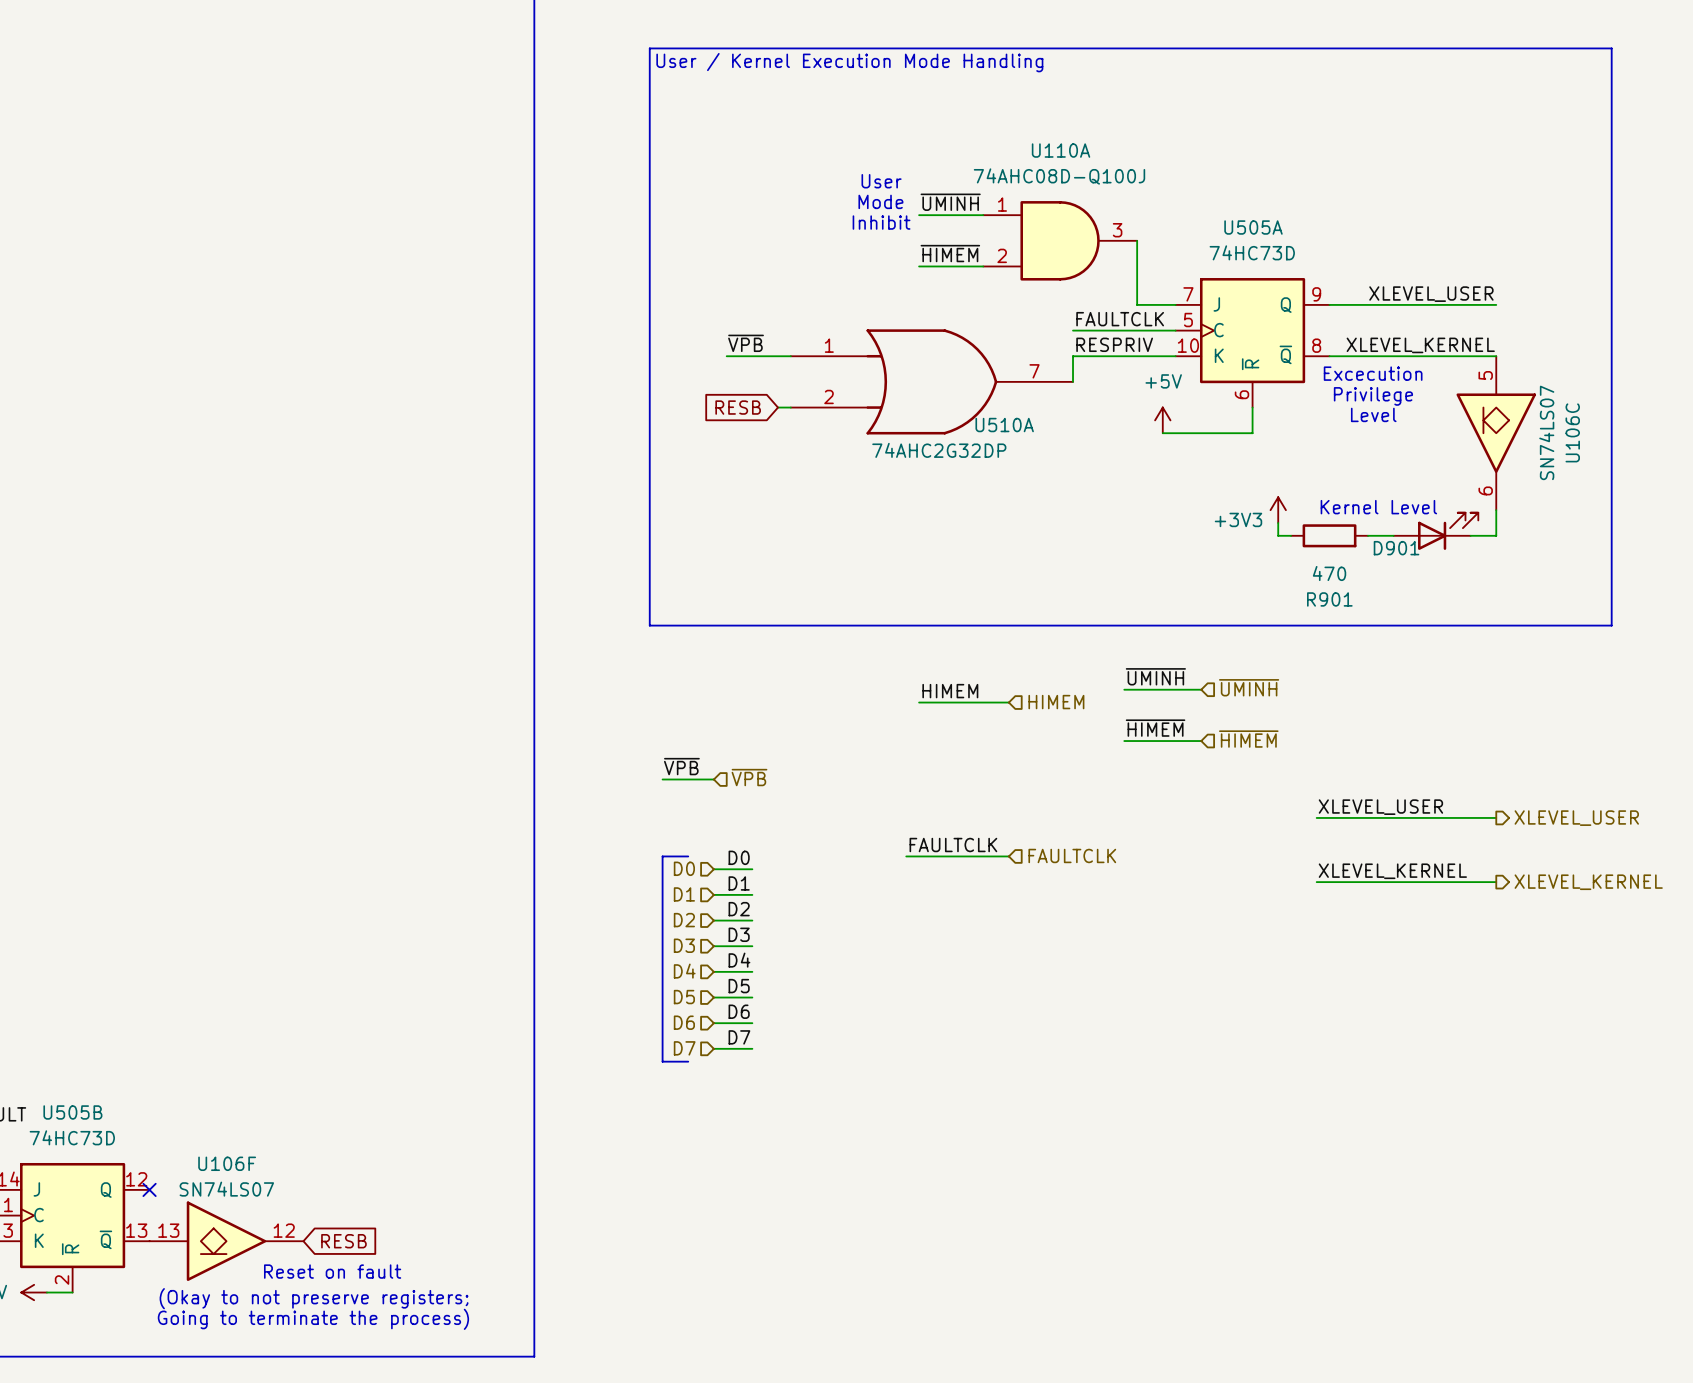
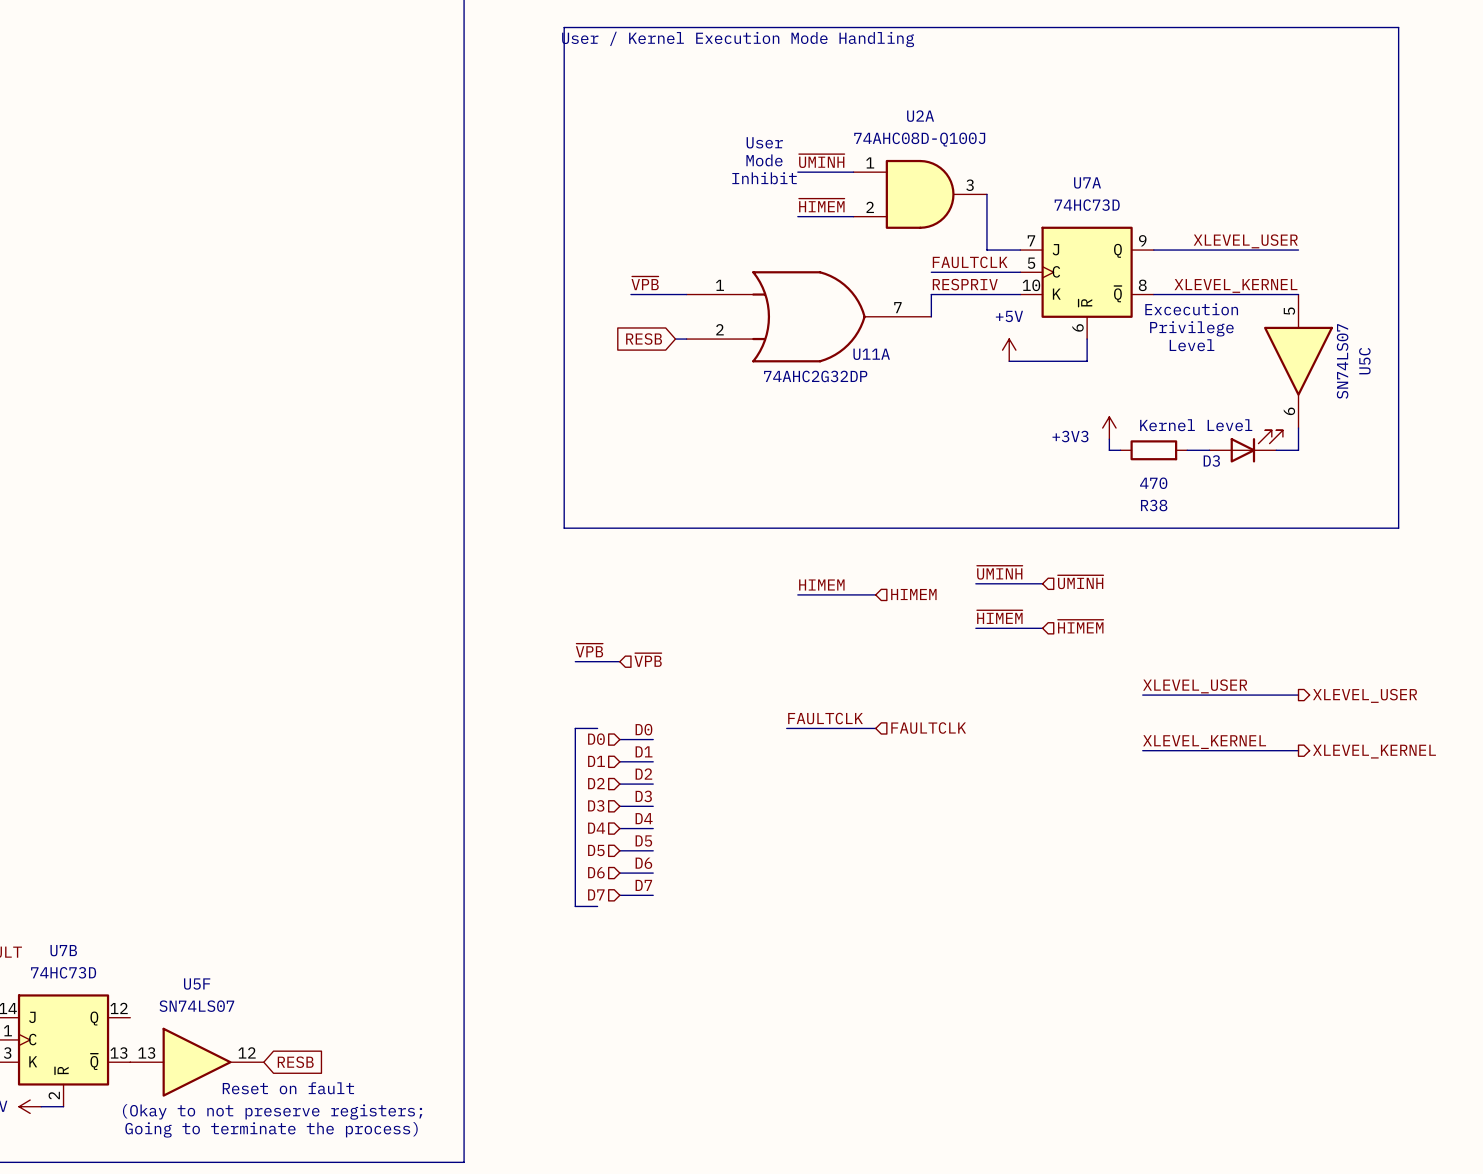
U110A name: U110A (1061, 150) -> U2A (920, 116)
U505A name: U505A (1253, 227) -> U7A (1087, 182)
U510A name: U510A (1004, 425) -> U11A (871, 354)
U106C: SN74LS07 (1496, 433) -> none
U5C: none -> SN74LS07 (1298, 361)
D901 name: D901 (1396, 548) -> D3 (1211, 461)
R901 name: R901 (1329, 599) -> R38 (1154, 505)
U505B name: U505B (72, 1112) -> U7B (63, 950)
no-connect mark: (149, 1189) -> none
U106F: SN74LS07 (226, 1241) -> none
U5F: none -> SN74LS07 (197, 1062)

